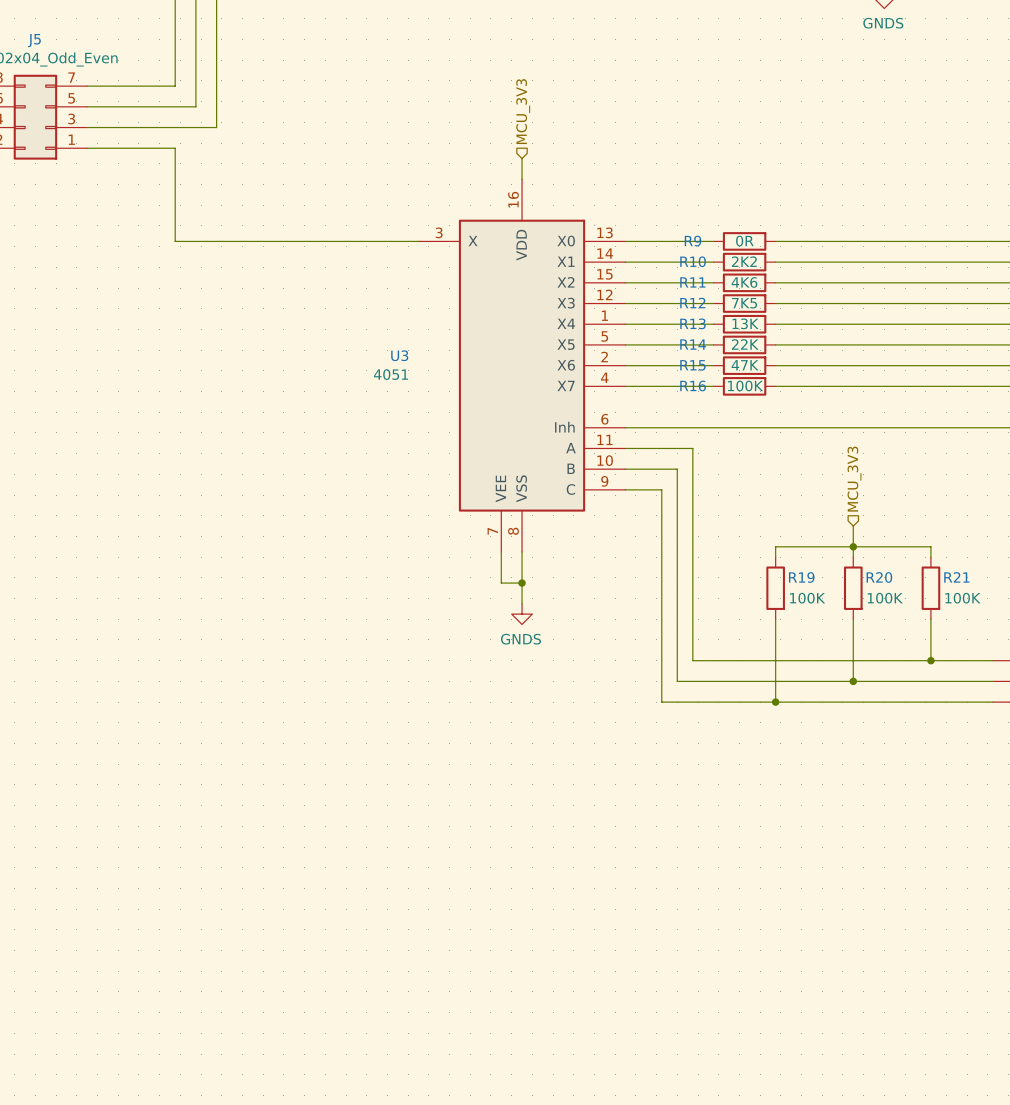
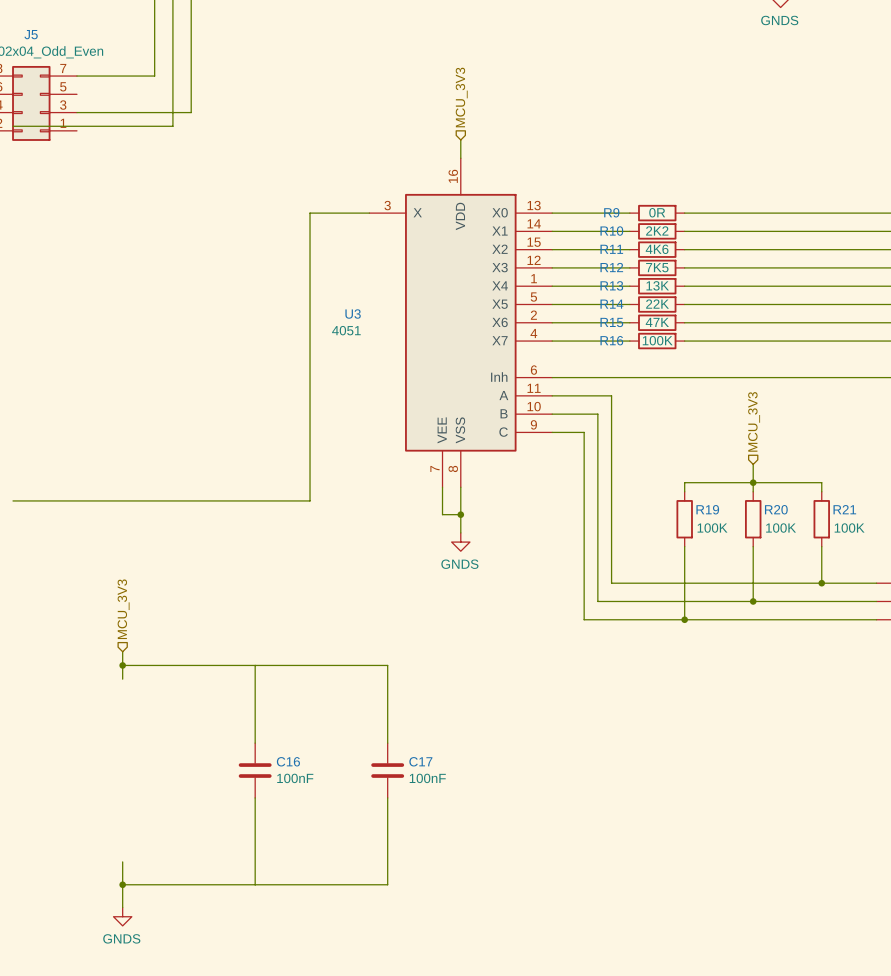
wire: (87, 106) (195, 106) -> (13, 126) (172, 126) (172, 94)
wire: (87, 148) (175, 148) (175, 241) (351, 241) -> (13, 500) (310, 500) (310, 213)
hierarchical label: none -> MCU_3V3 (123, 609)
wire: none -> (122, 651) (122, 679)
wire: none -> (122, 665) (387, 665) (387, 743)
junction: none -> (122, 665)
wire: none -> (255, 665) (255, 743)
C16: none -> 100nF (255, 770)
C17: none -> 100nF (387, 770)
wire: none -> (255, 797) (255, 884)
wire: none -> (387, 797) (387, 884) (122, 884)
wire: none -> (122, 861) (122, 907)
junction: none -> (122, 884)
power symbol: none -> GNDS (122, 916)

